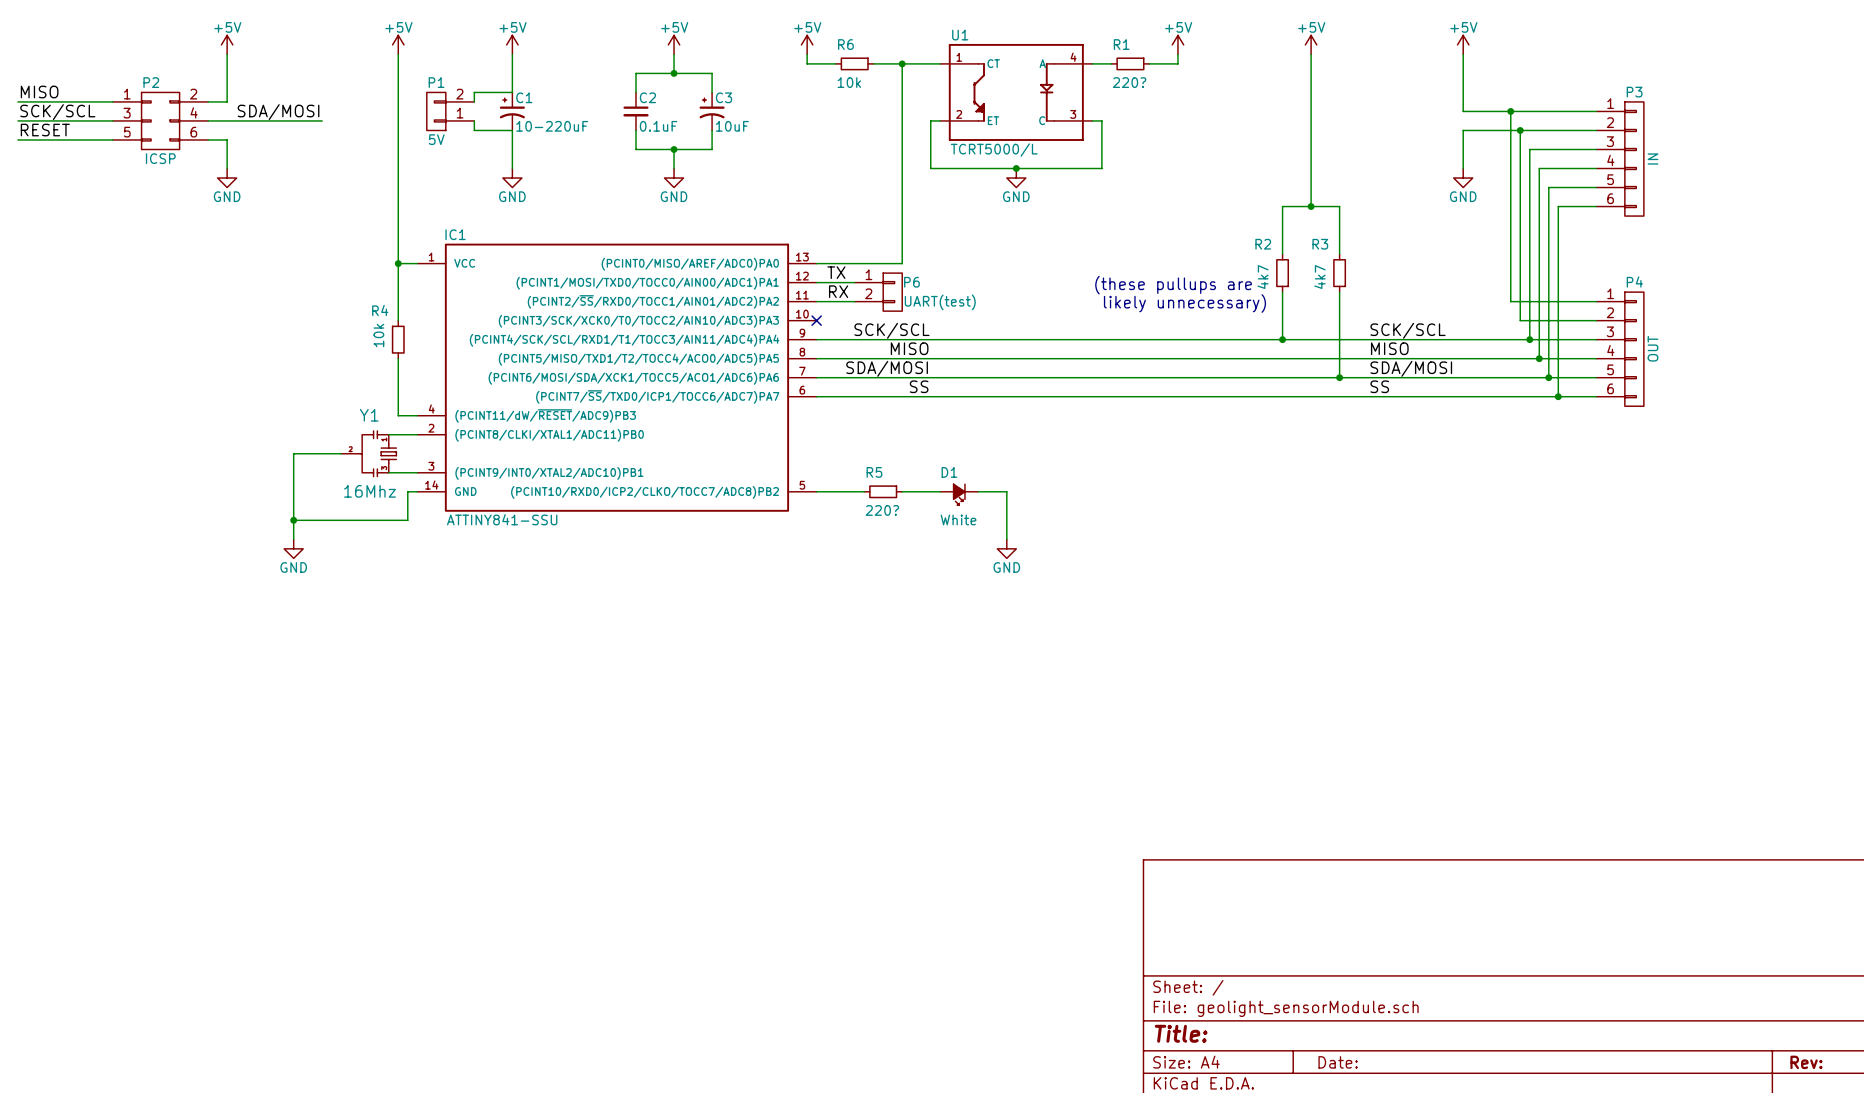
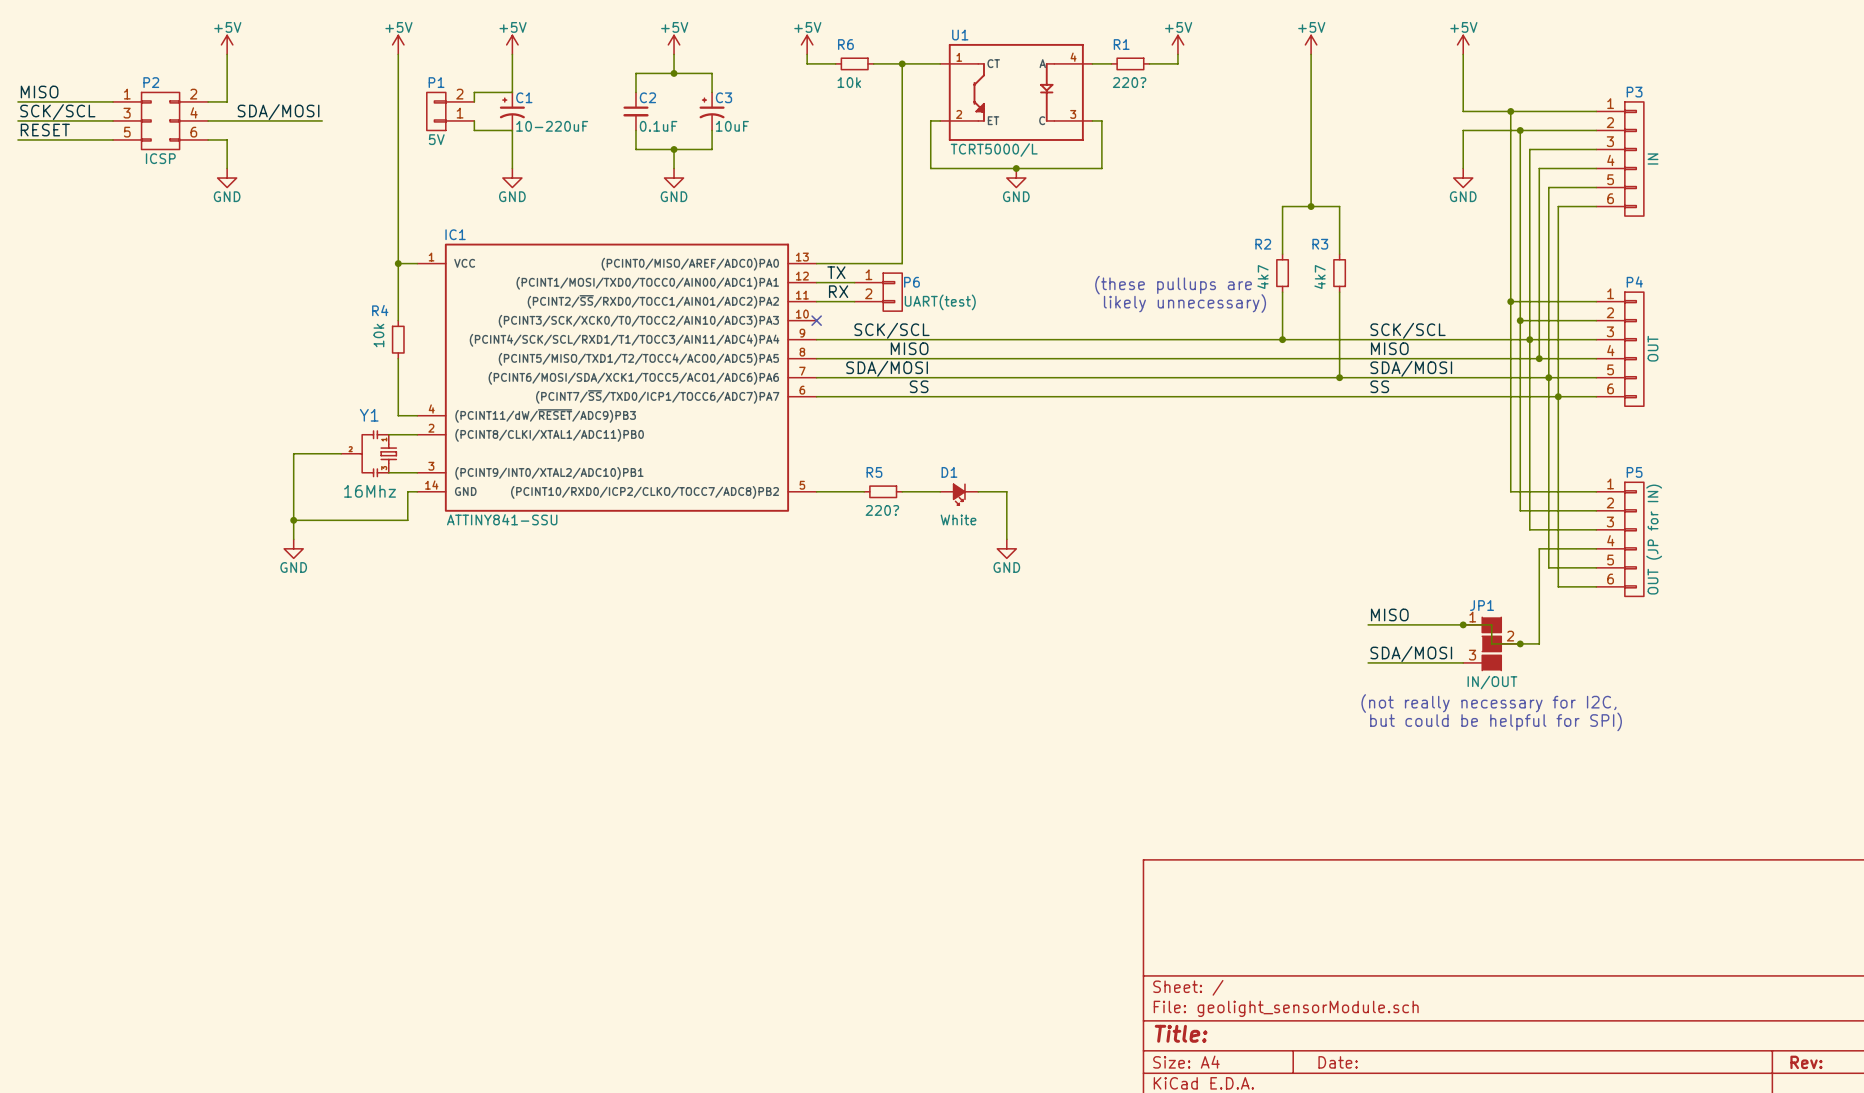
wire: none -> (1510, 301) (1510, 491) (1596, 491)
junction: none -> (1510, 301)
wire: none -> (1520, 320) (1520, 510) (1596, 510)
junction: none -> (1520, 320)
wire: none -> (1529, 339) (1529, 529) (1596, 529)
wire: none -> (1548, 377) (1548, 567) (1596, 567)
wire: none -> (1558, 396) (1558, 586) (1596, 586)
P5: none -> OUT (JP for IN) (1620, 539)
wire: none -> (1596, 548) (1539, 548) (1539, 643) (1491, 643) (1491, 624) (1368, 624)
label: none -> MISO (1389, 614)
junction: none -> (1463, 624)
JP1: none -> IN/OUT (1491, 643)
junction: none -> (1520, 643)
label: none -> SDA/MOSI (1411, 654)
wire: none -> (1368, 662) (1463, 662)
text: none -> (not really necessary for I2C, (1488, 703)
text: none -> but could be helpful for SPI) (1496, 721)

